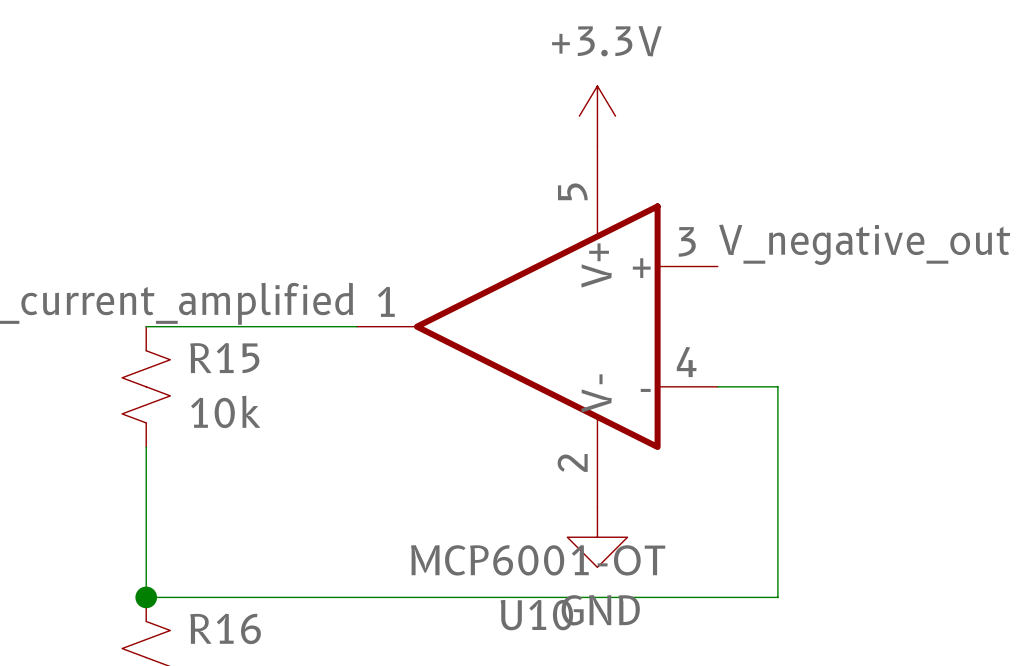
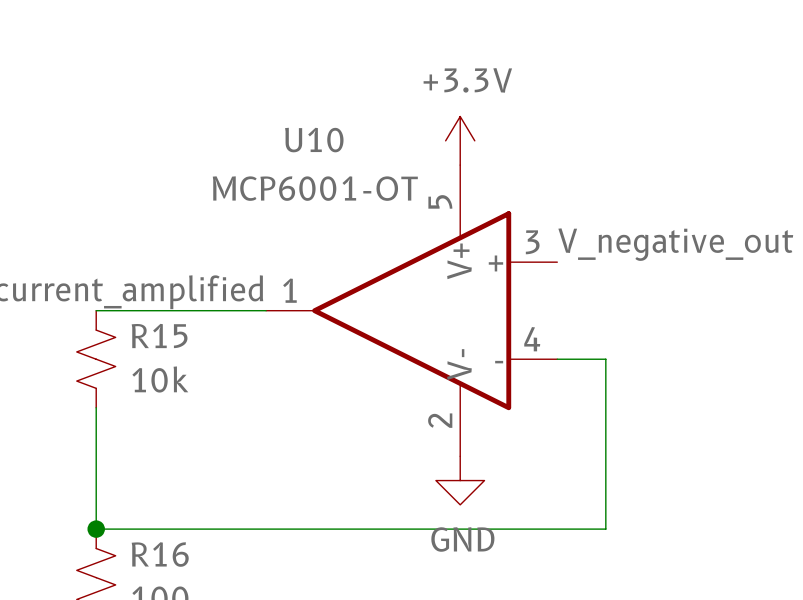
U10 value position: MCP6001-OT (538, 560) -> MCP6001-OT (315, 188)
U10 name position: U10 (536, 615) -> U10 (314, 140)

